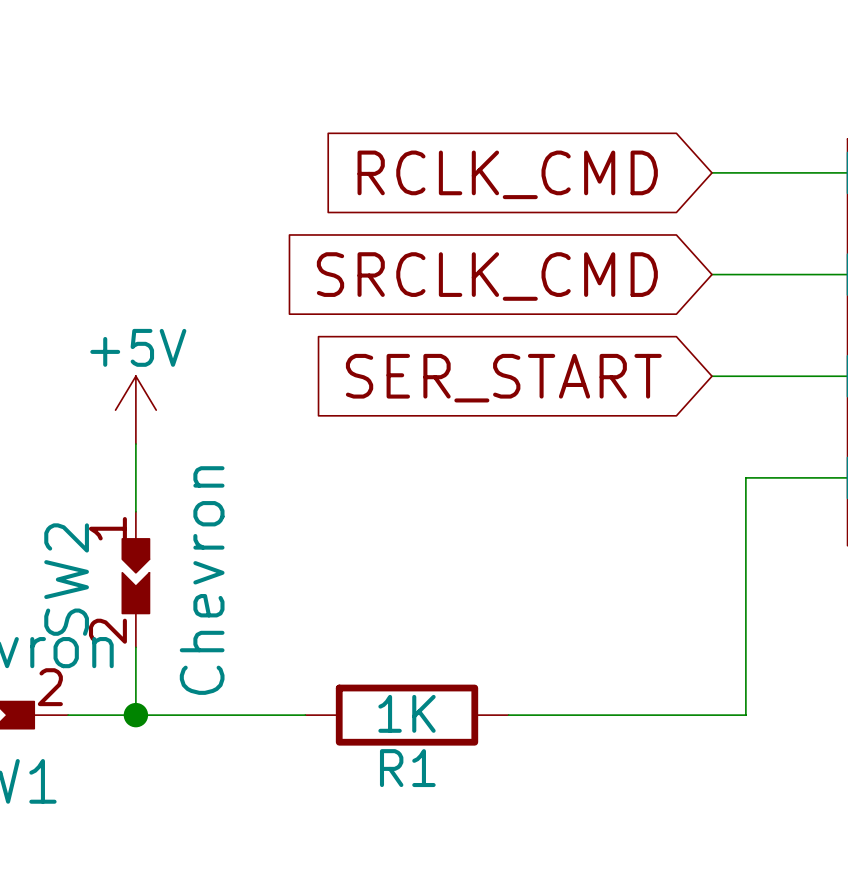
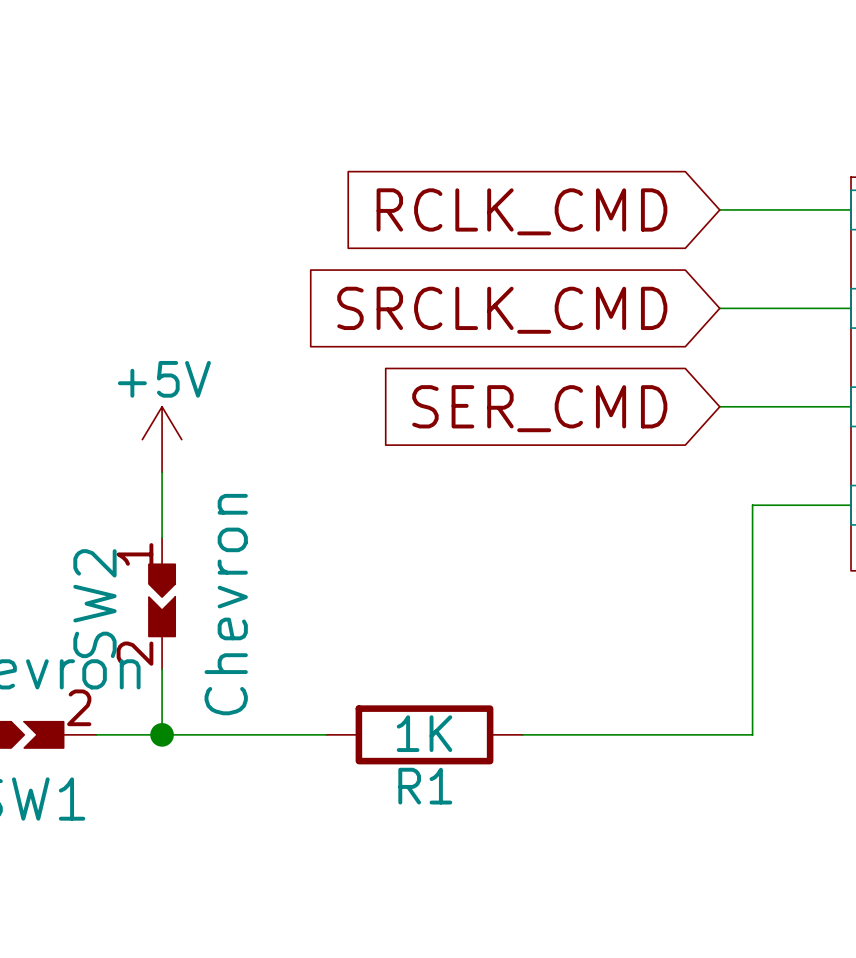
global label: SER_START (503, 378) -> SER_CMD (539, 408)

